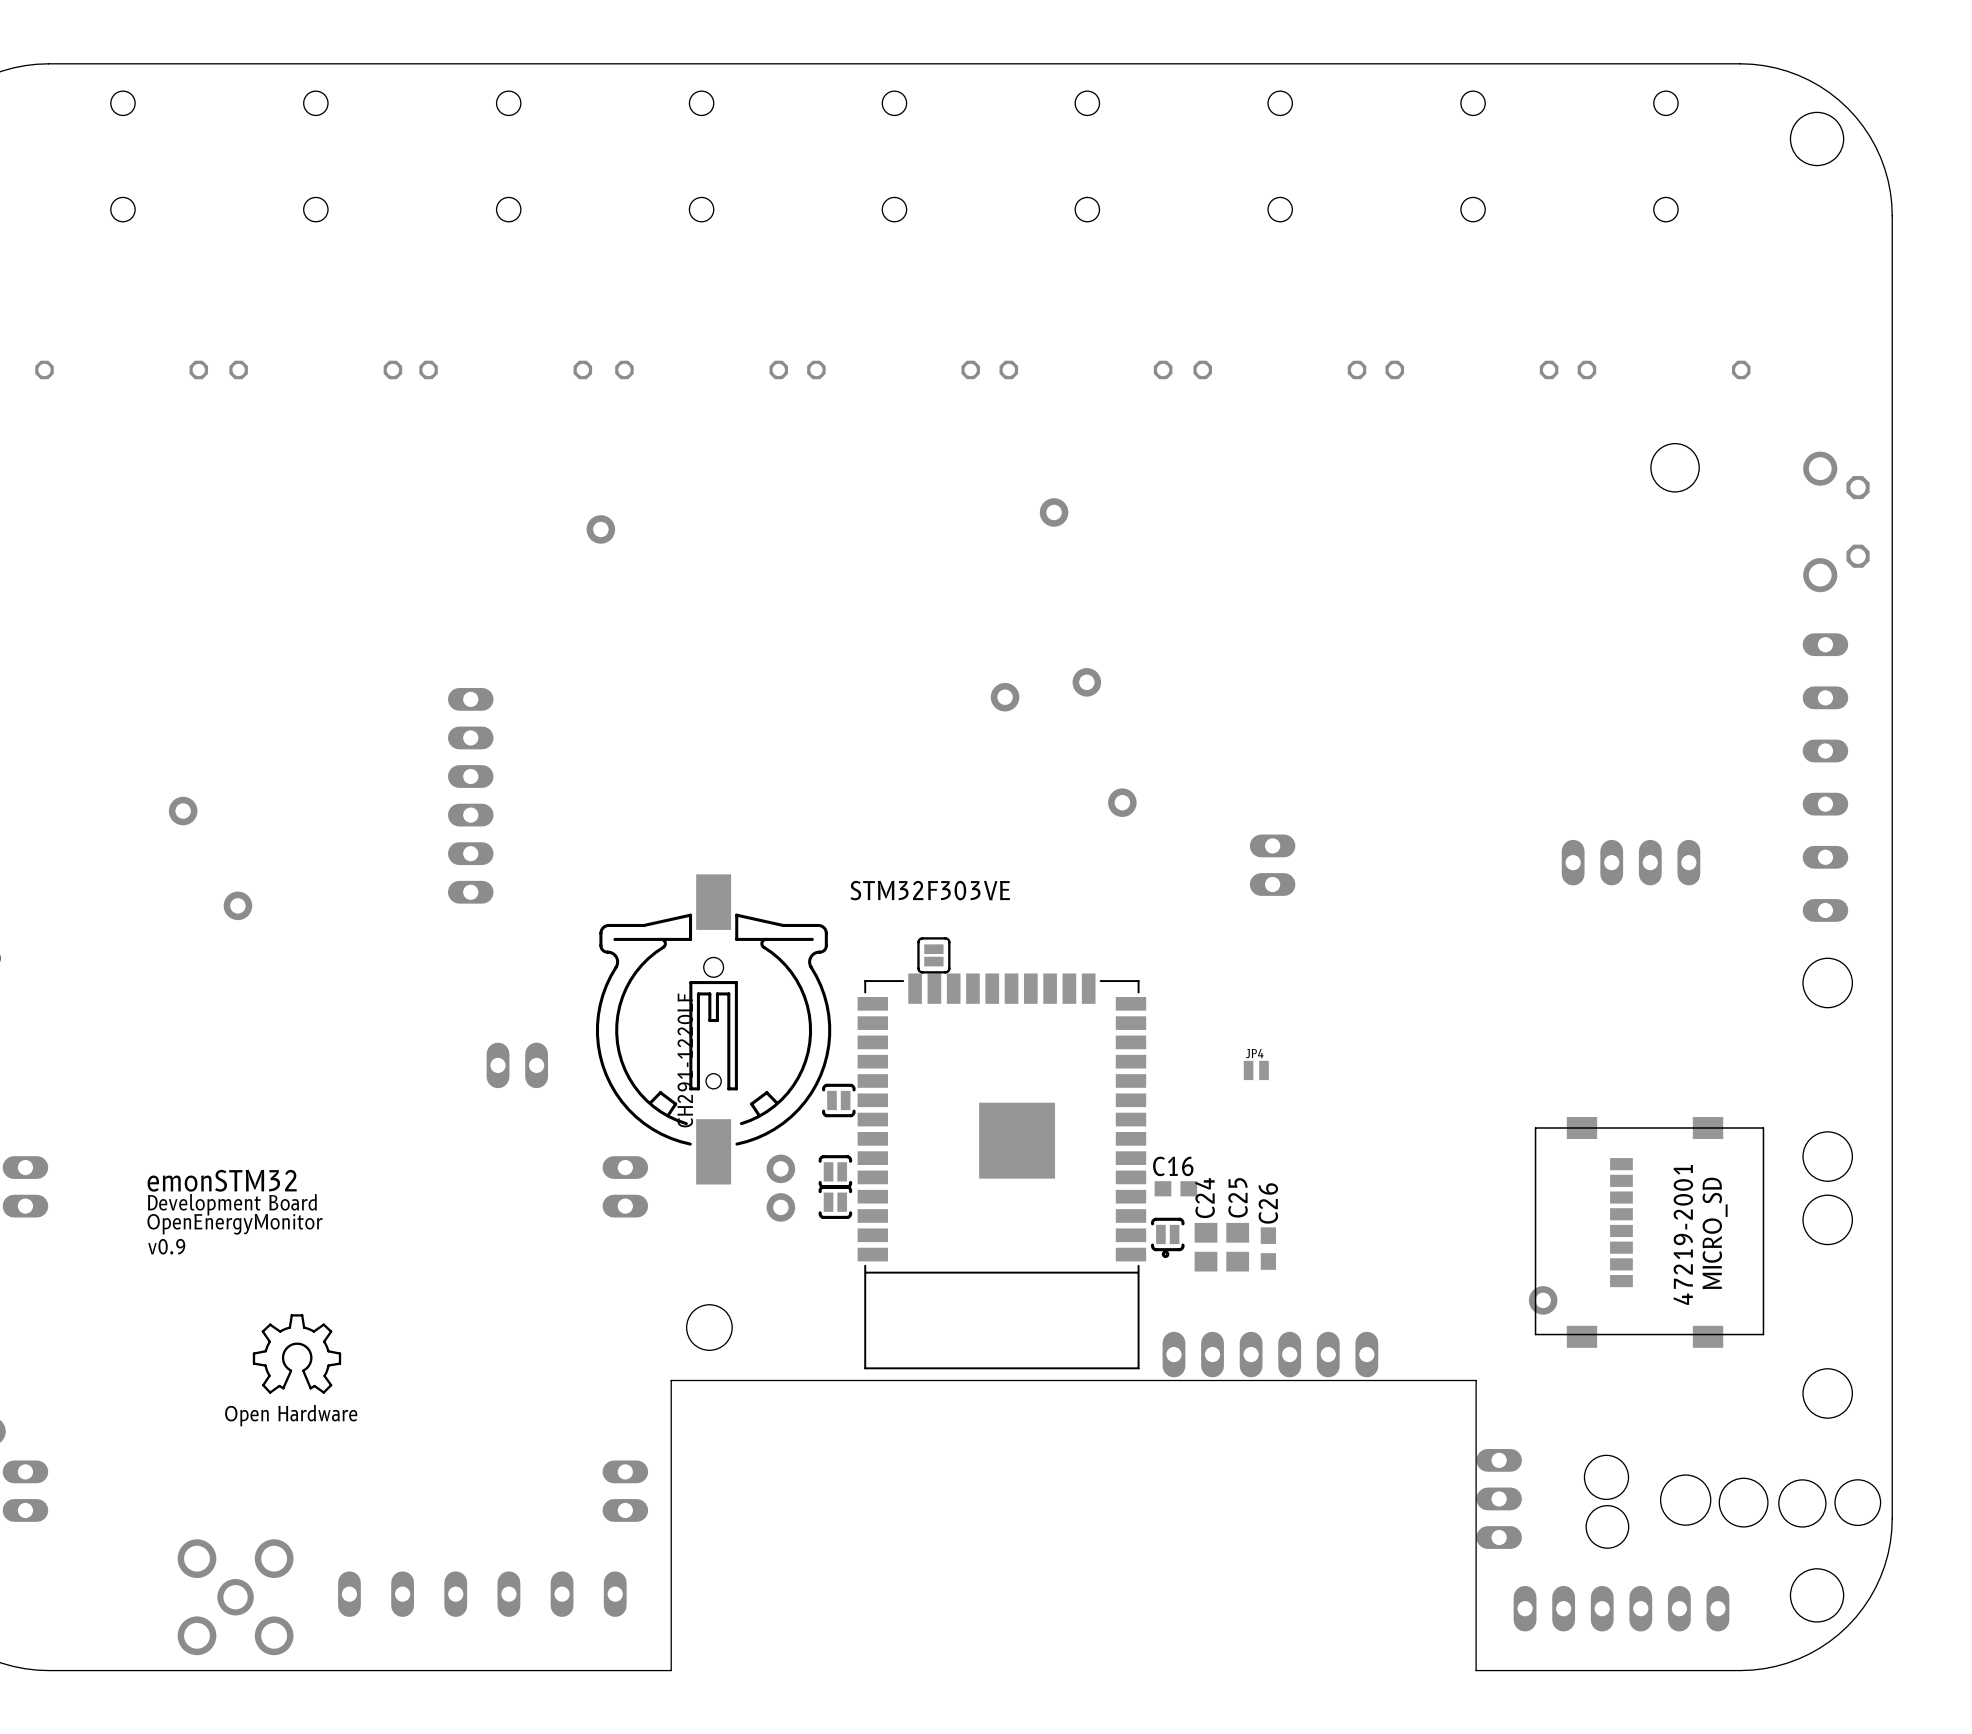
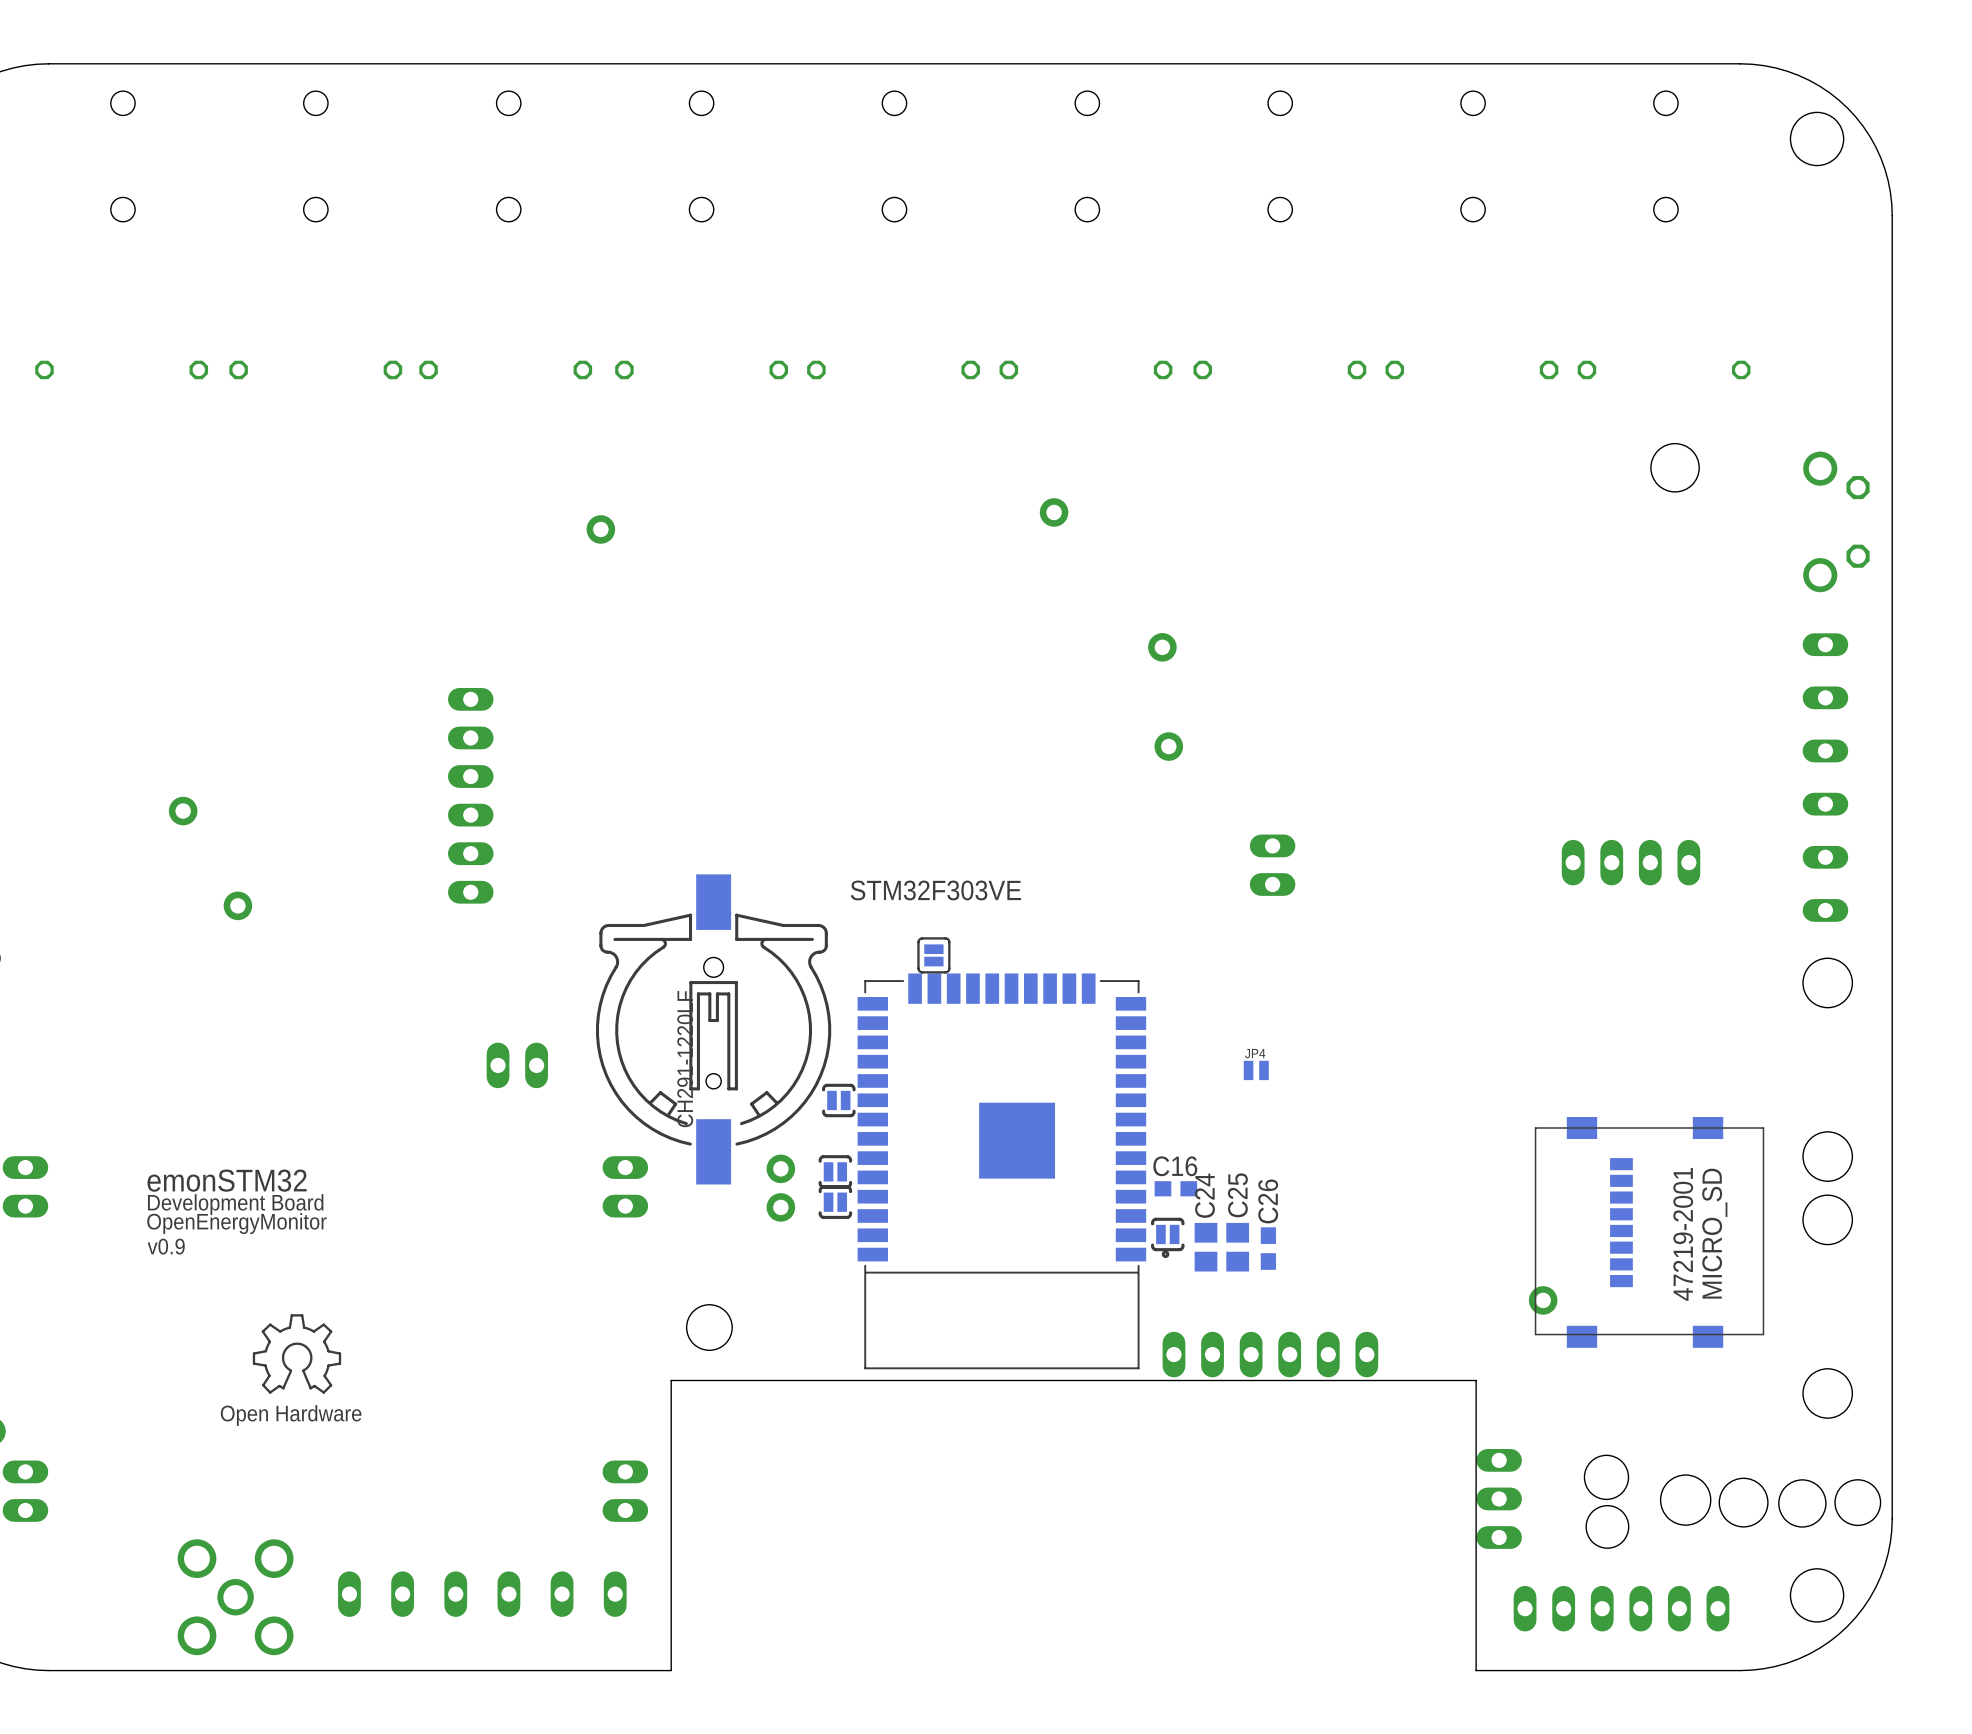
part: none -> (1162, 647)
part: (1086, 682) -> none
part: (1005, 697) -> none
part: none -> (1168, 746)
part: (1122, 802) -> none

